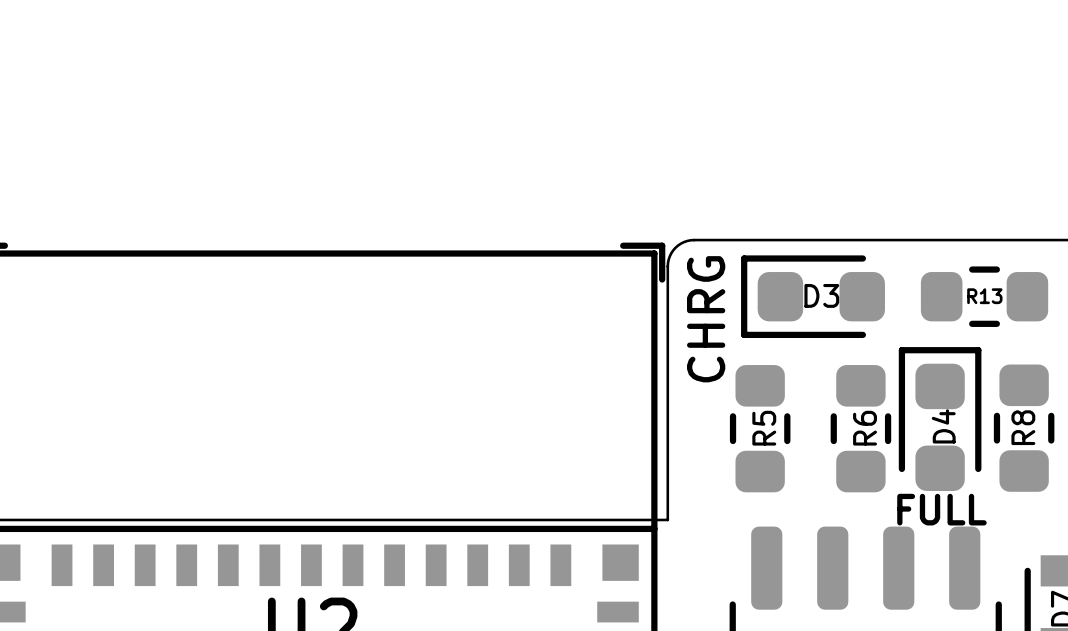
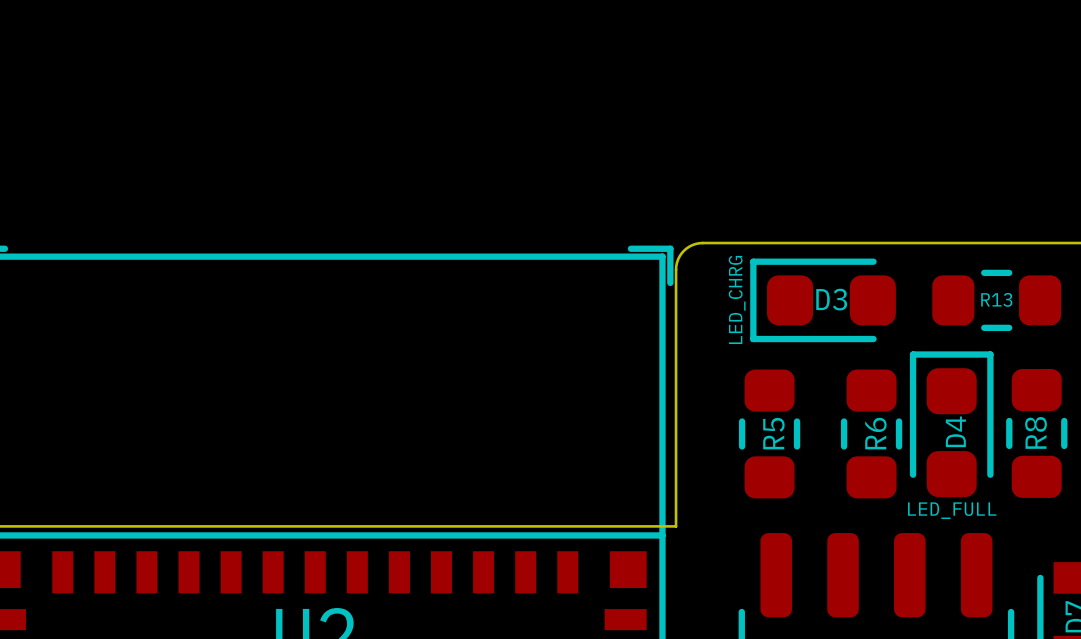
D3 value: CHRG (706, 319) -> LED_CHRG (737, 299)
D4 value: FULL (941, 509) -> LED_FULL (952, 510)

